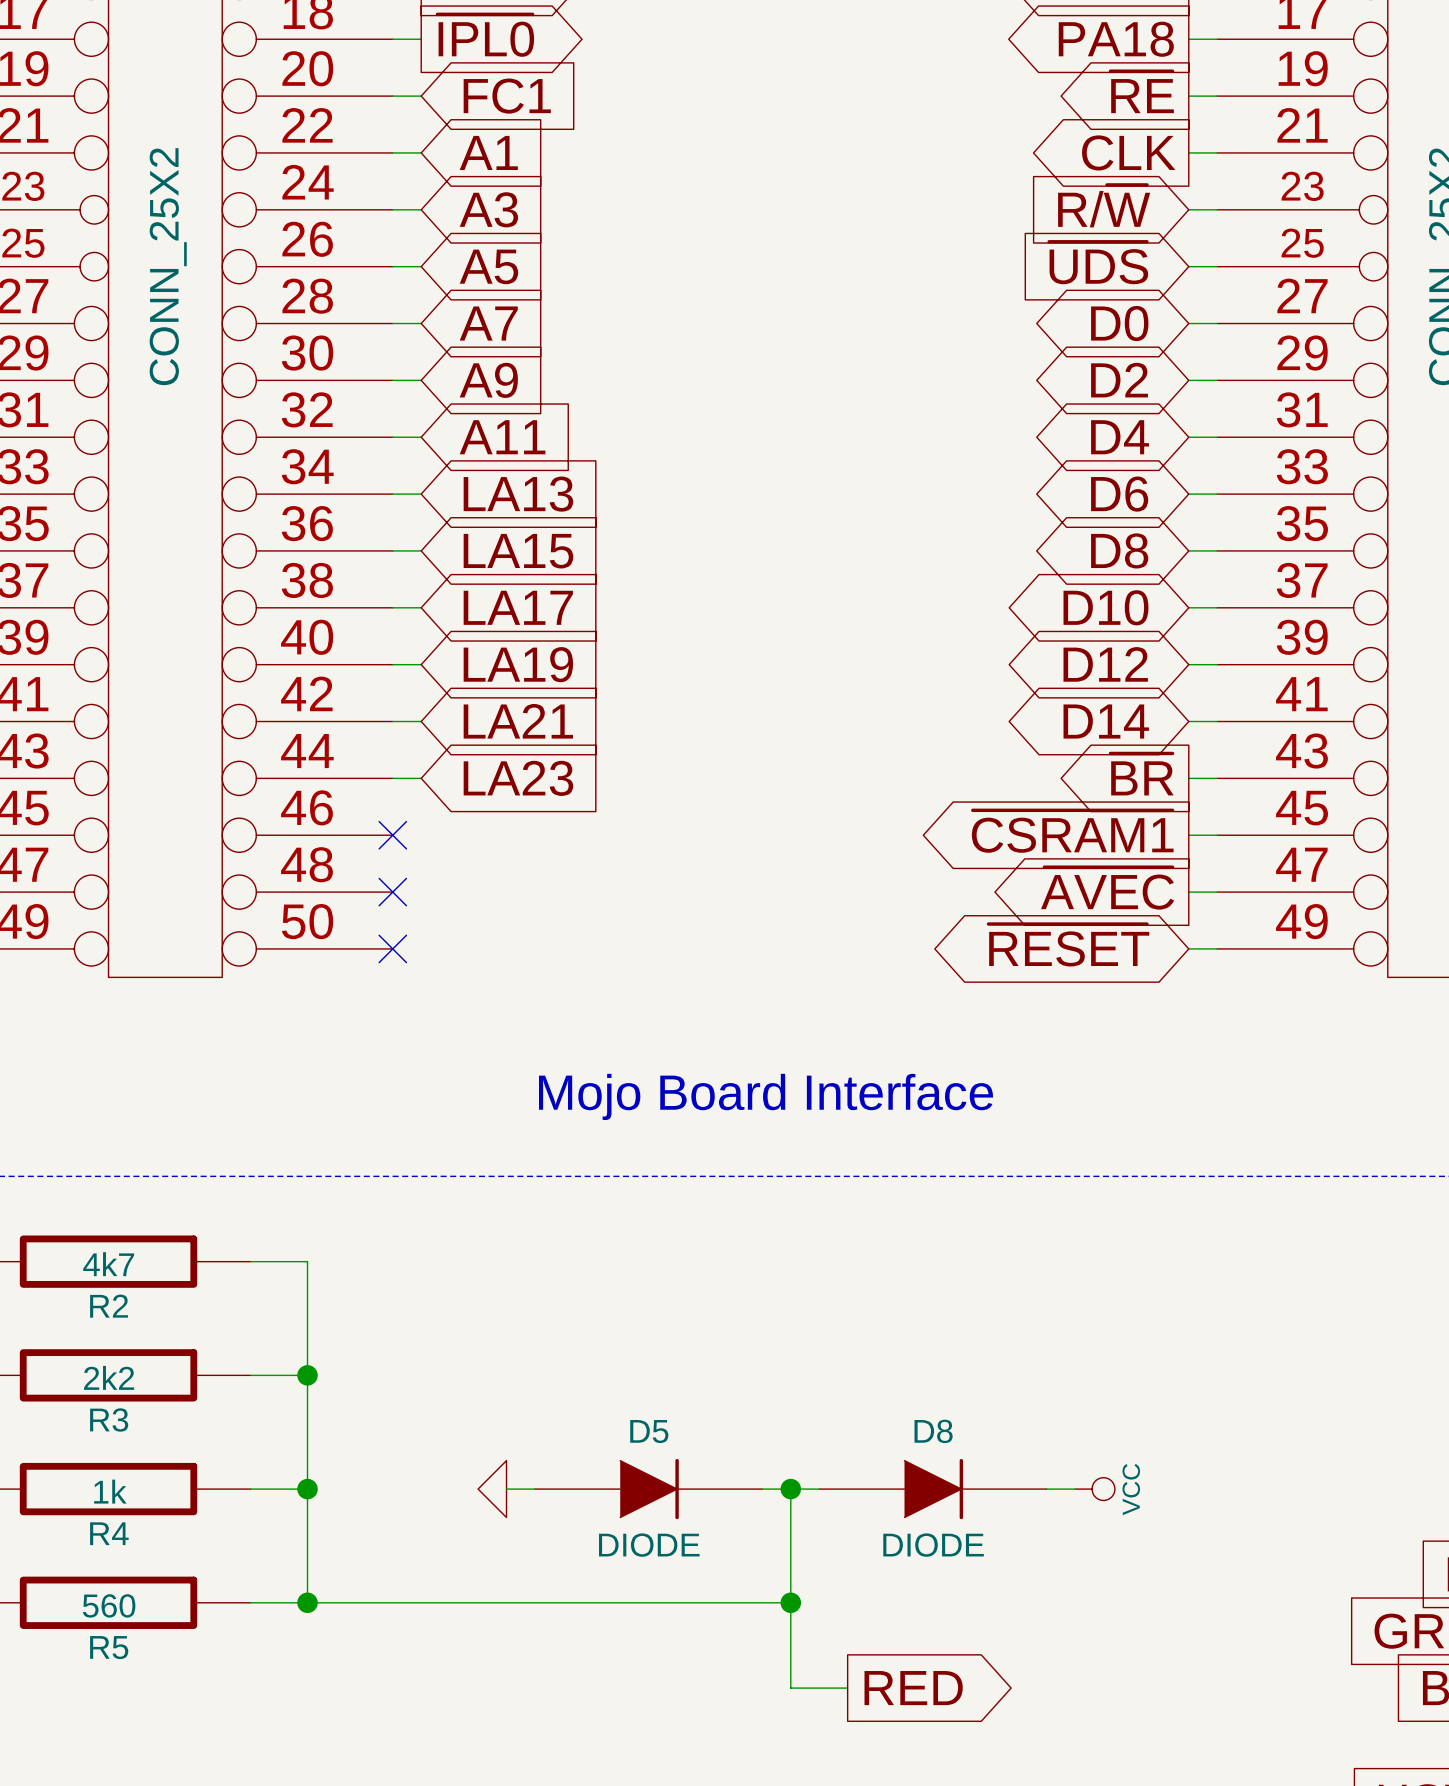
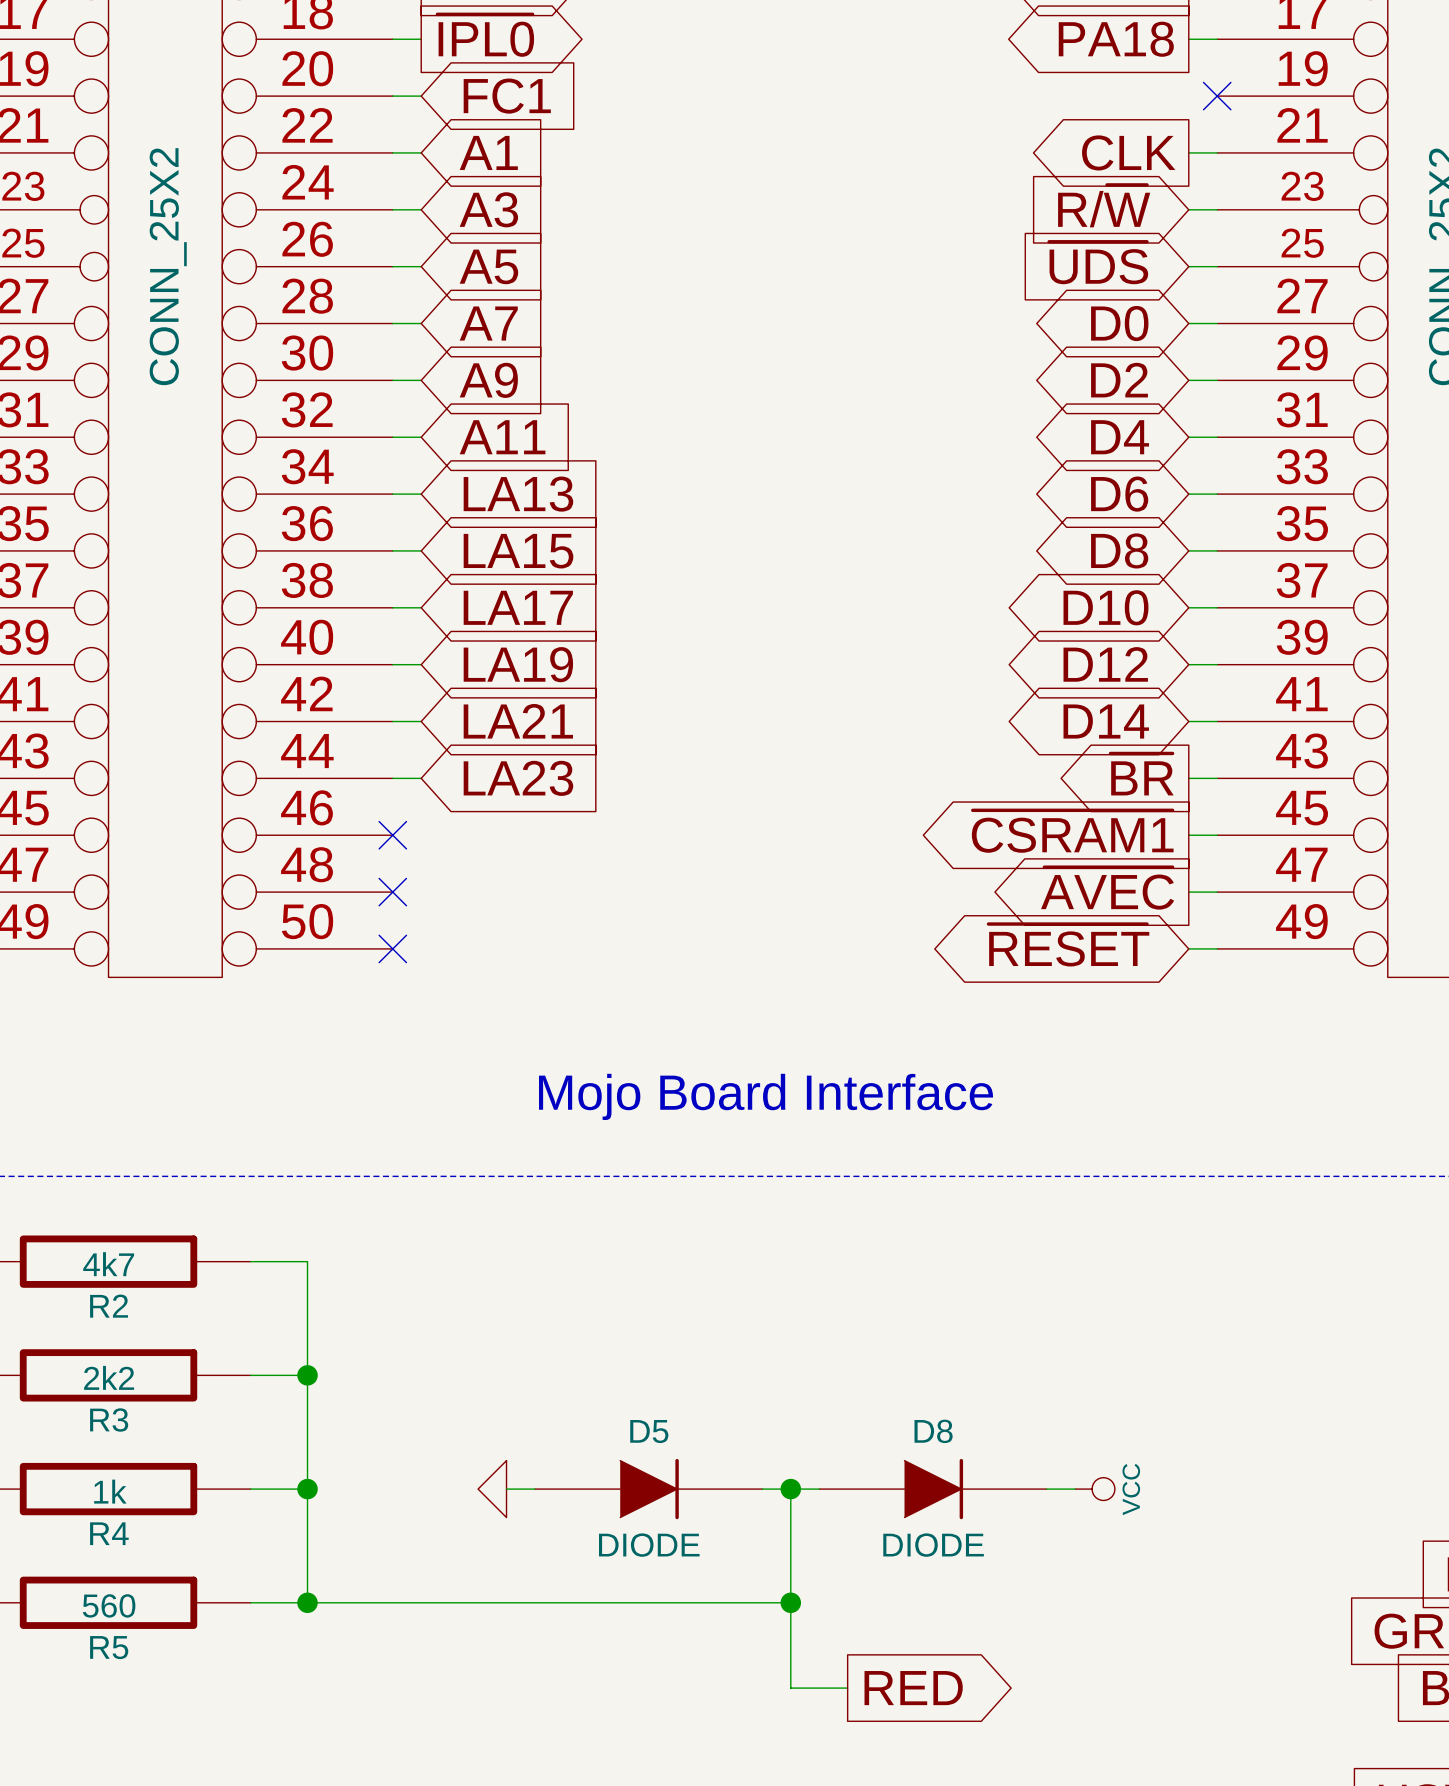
global label: ~{RE} (1142, 92) -> none
wire: (1188, 96) (1217, 96) -> none
no-connect mark: none -> (1217, 96)

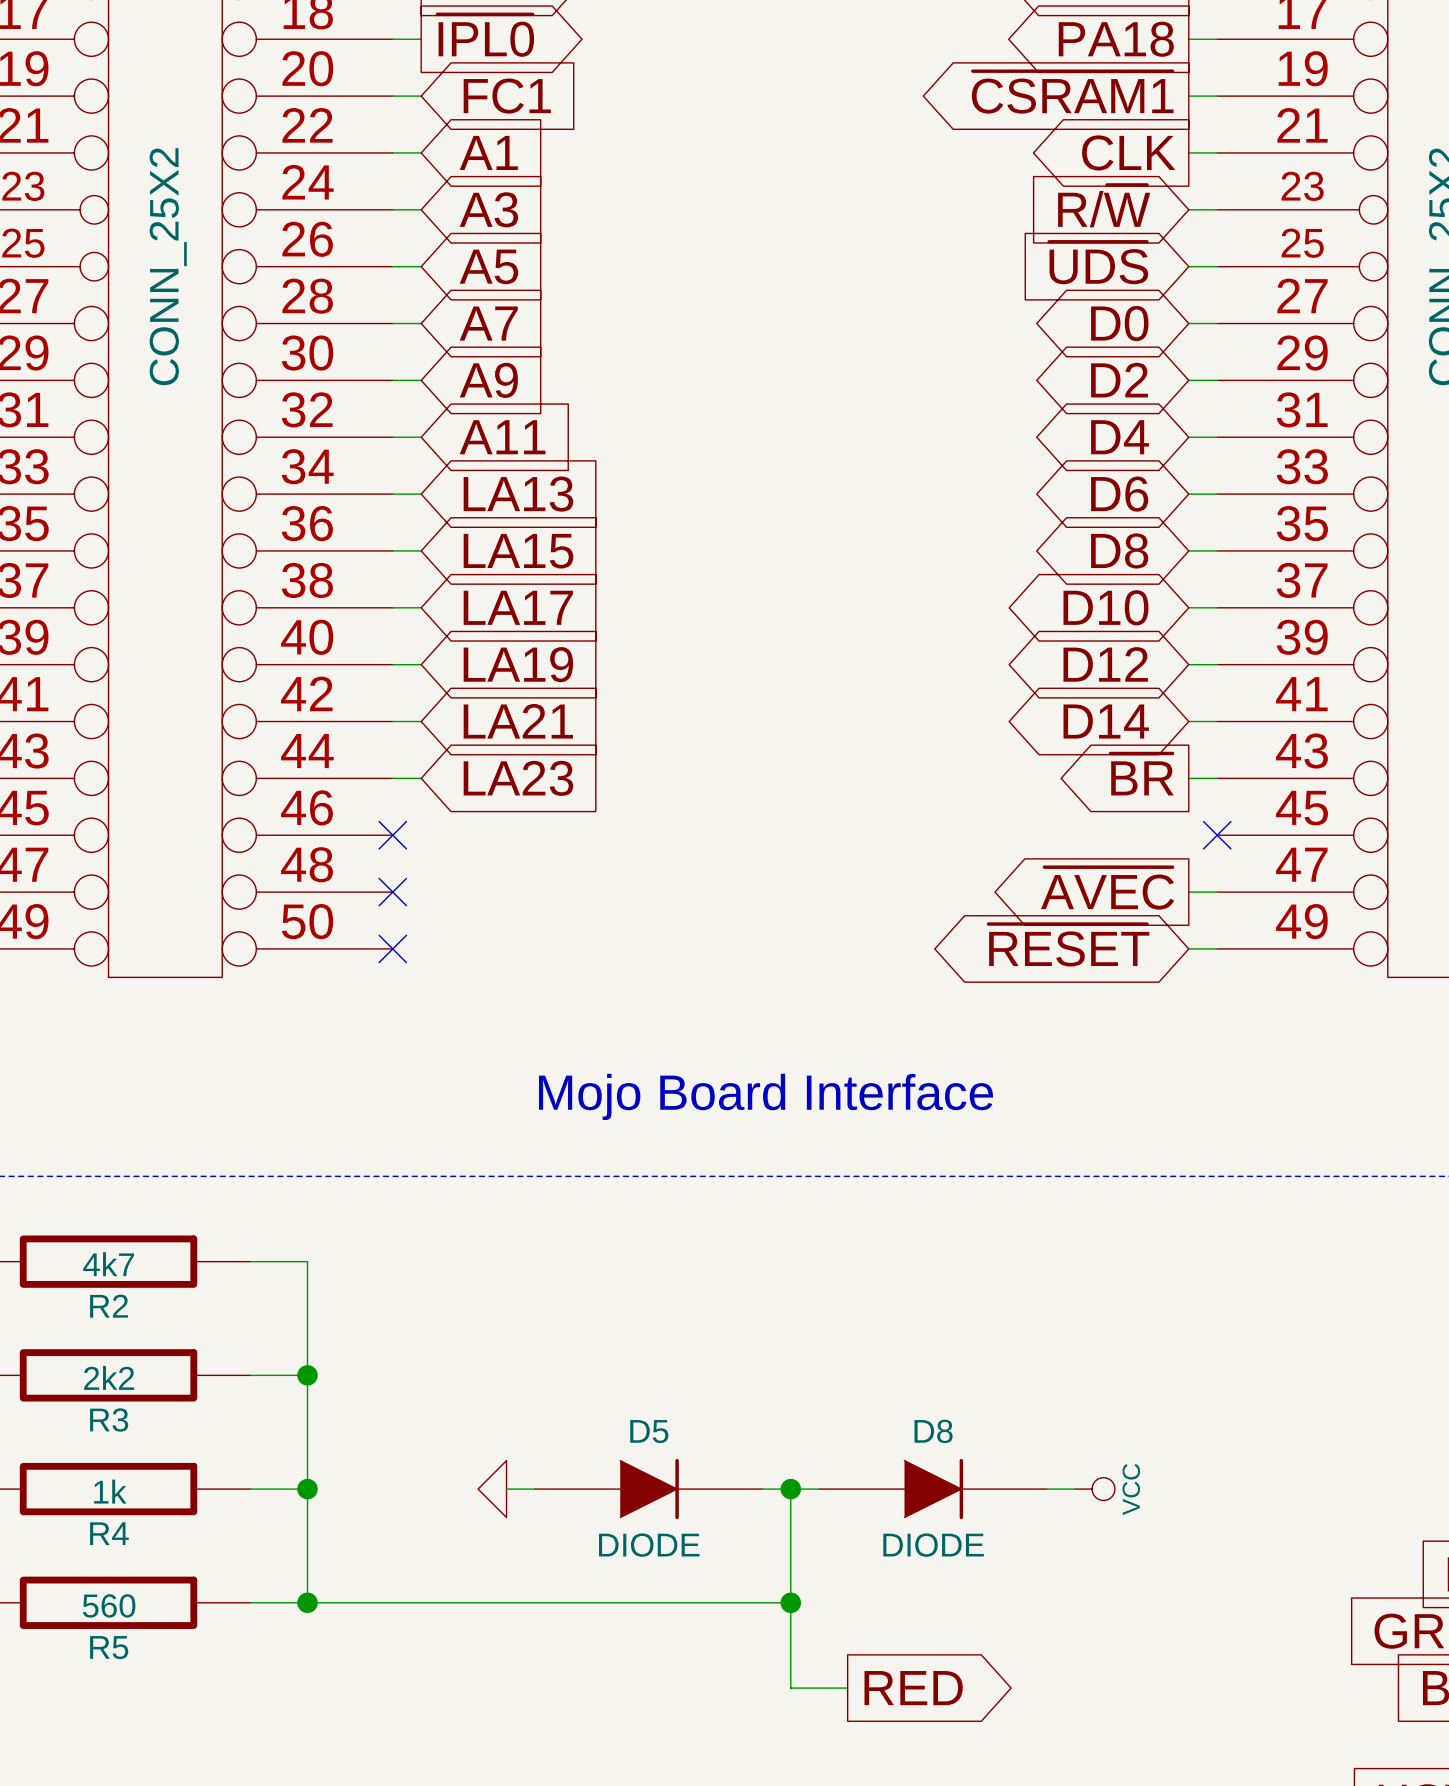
global label: none -> ~{CSRAM1} (1072, 92)
wire: none -> (1188, 96) (1217, 96)
no-connect mark: (1217, 96) -> none
global label: ~{CSRAM1} (1072, 831) -> none
wire: (1188, 835) (1217, 835) -> none
no-connect mark: none -> (1217, 835)

